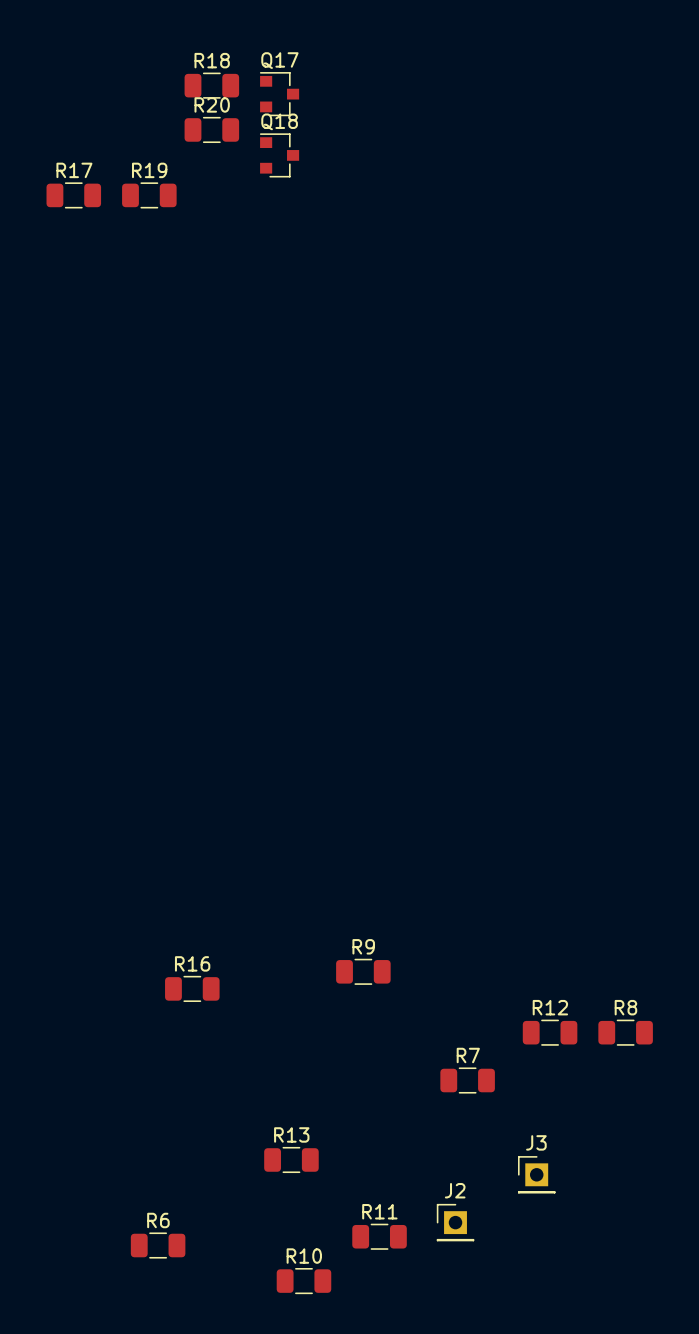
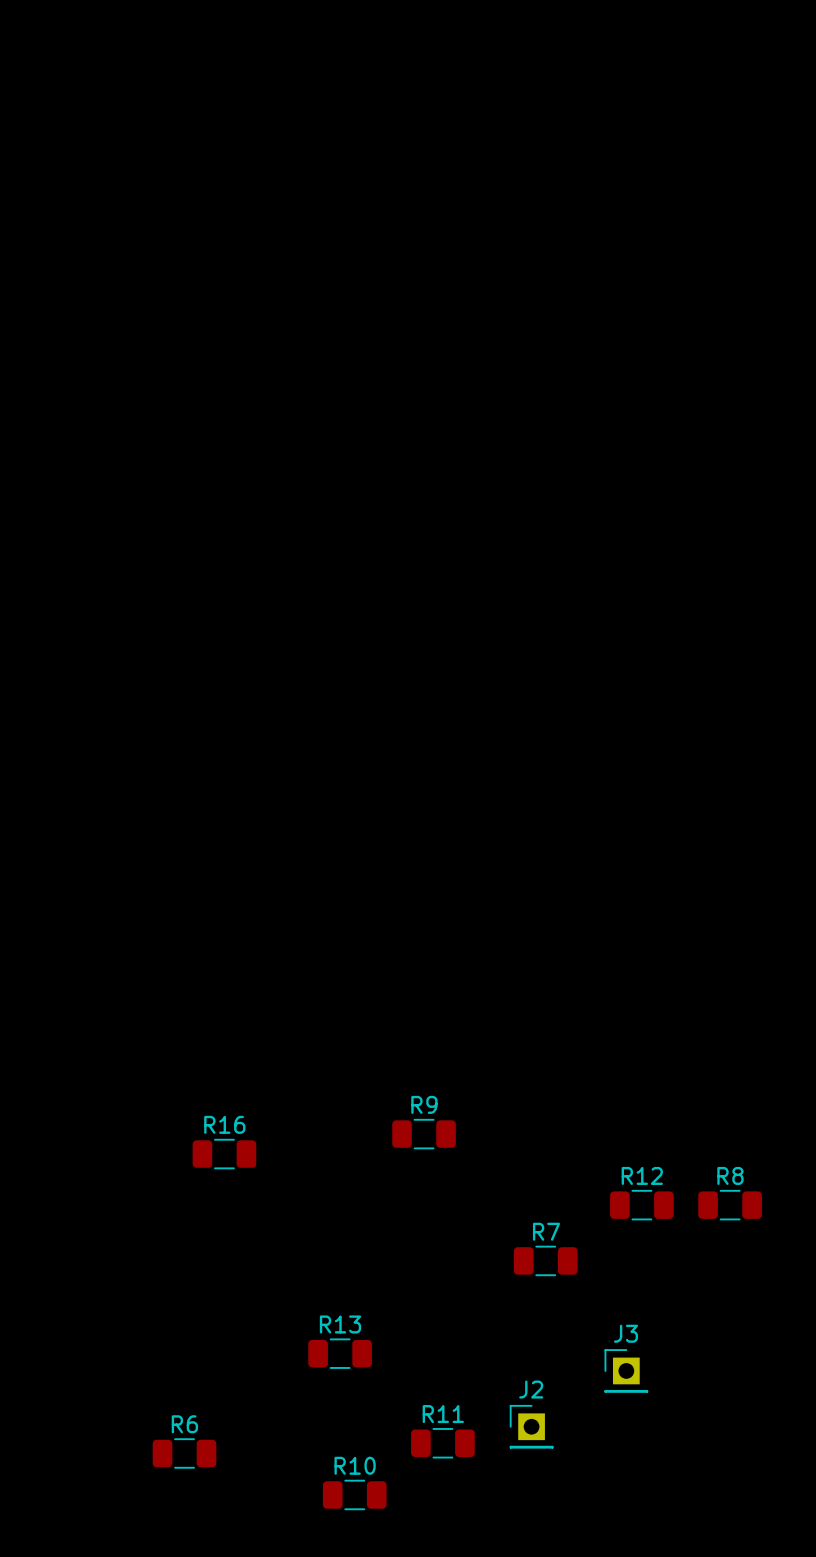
R18: (211, 85) -> none
Q17: (279, 94) -> none
R20: (211, 129) -> none
Q18: (279, 155) -> none
R17: (73, 195) -> none
R19: (149, 195) -> none

